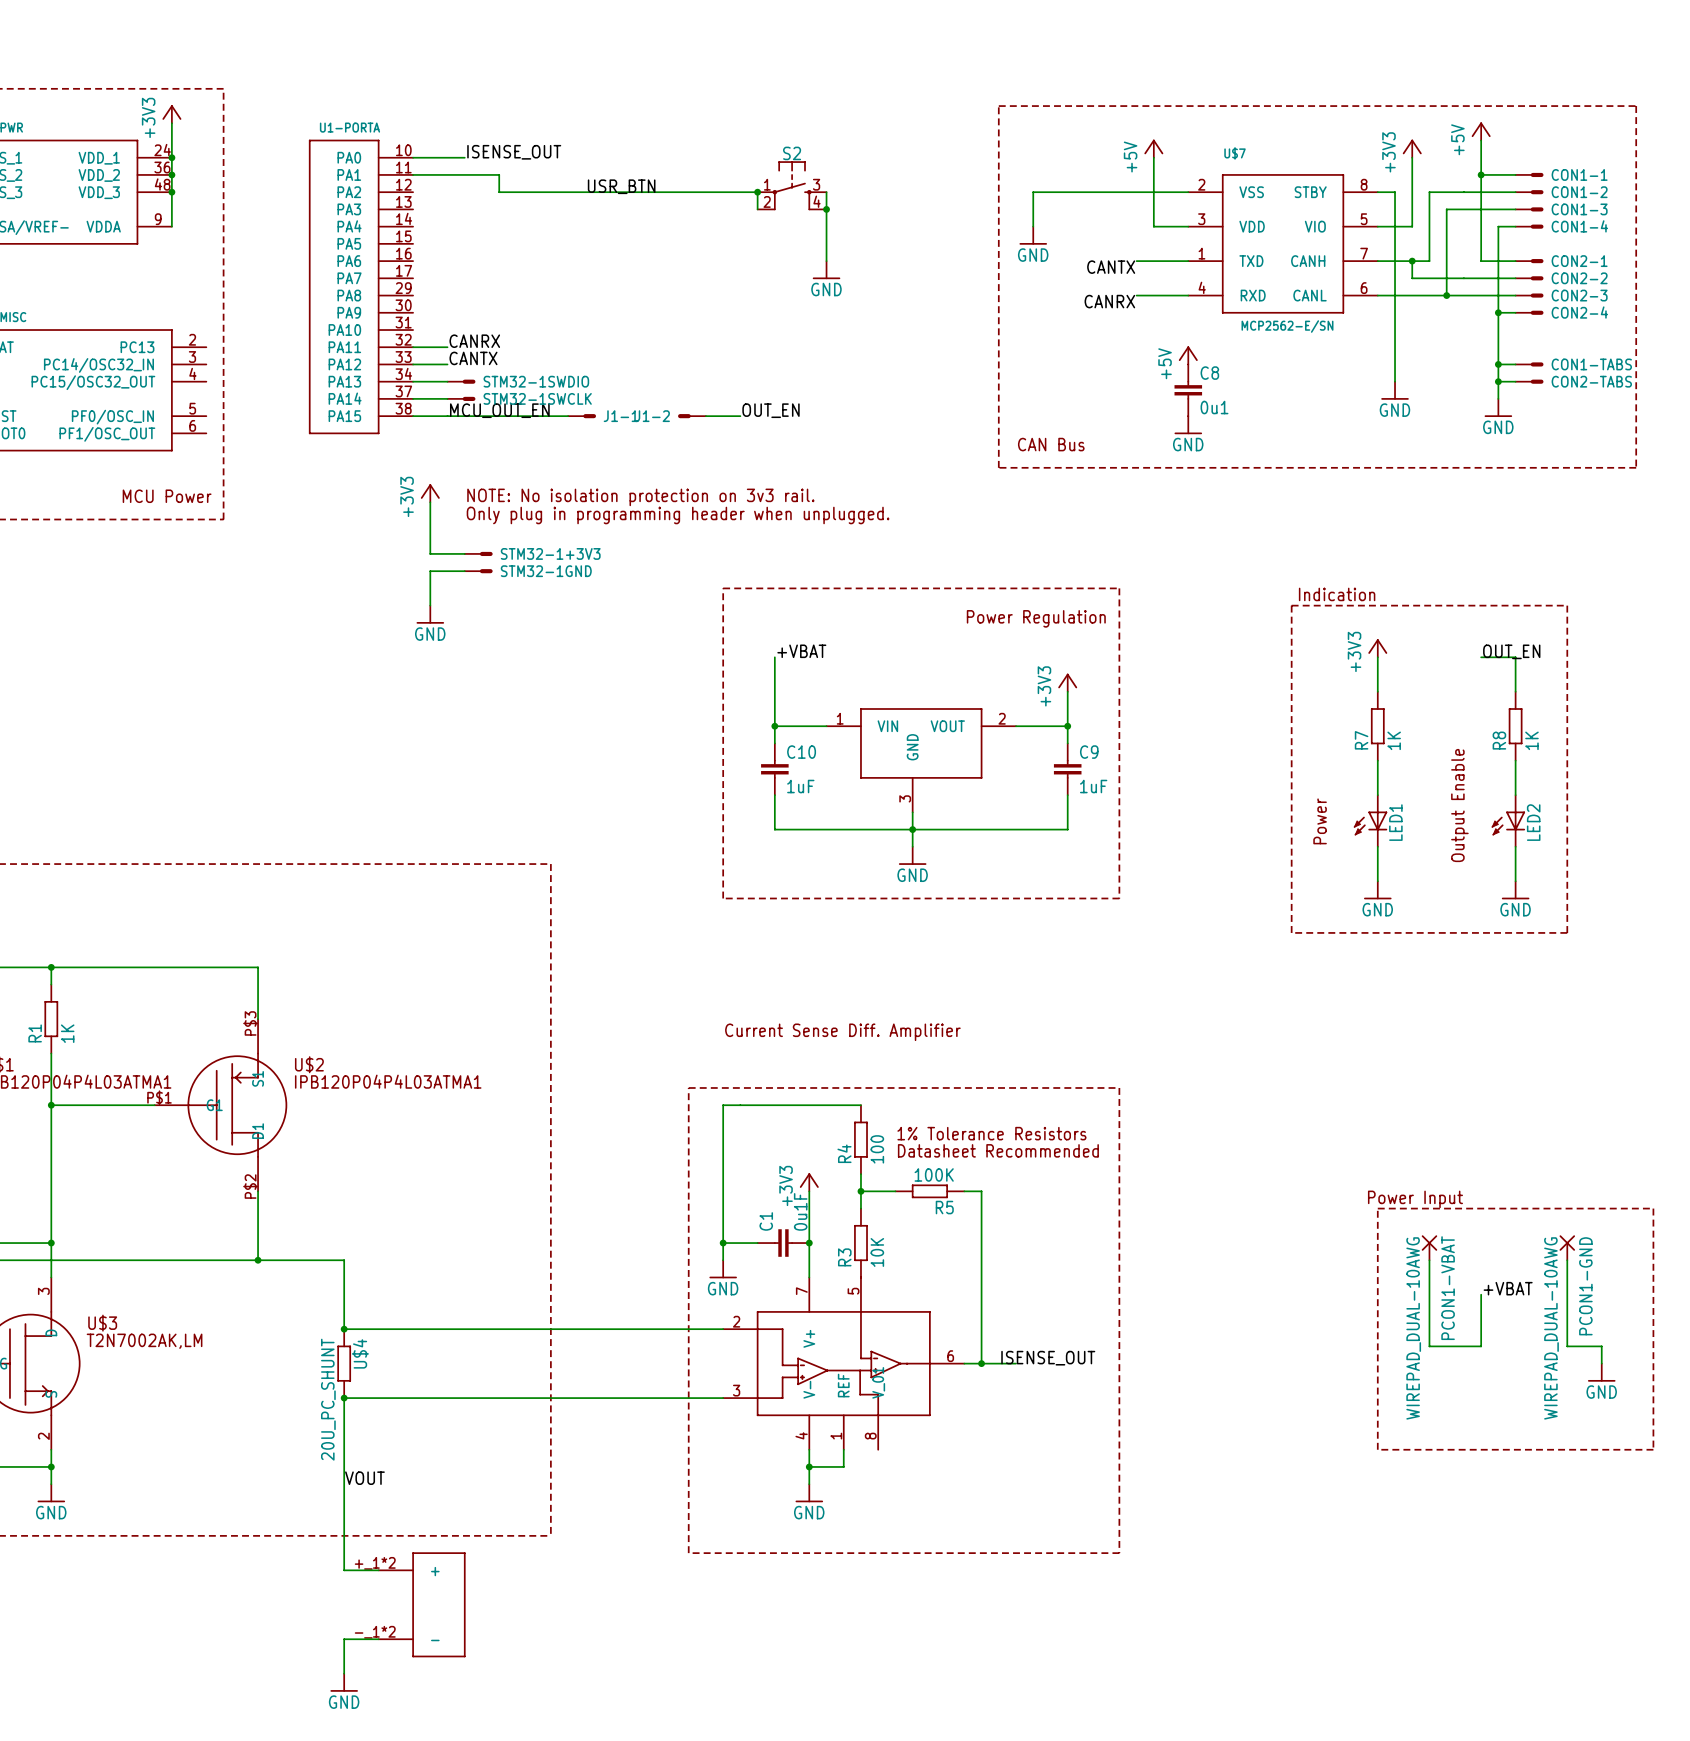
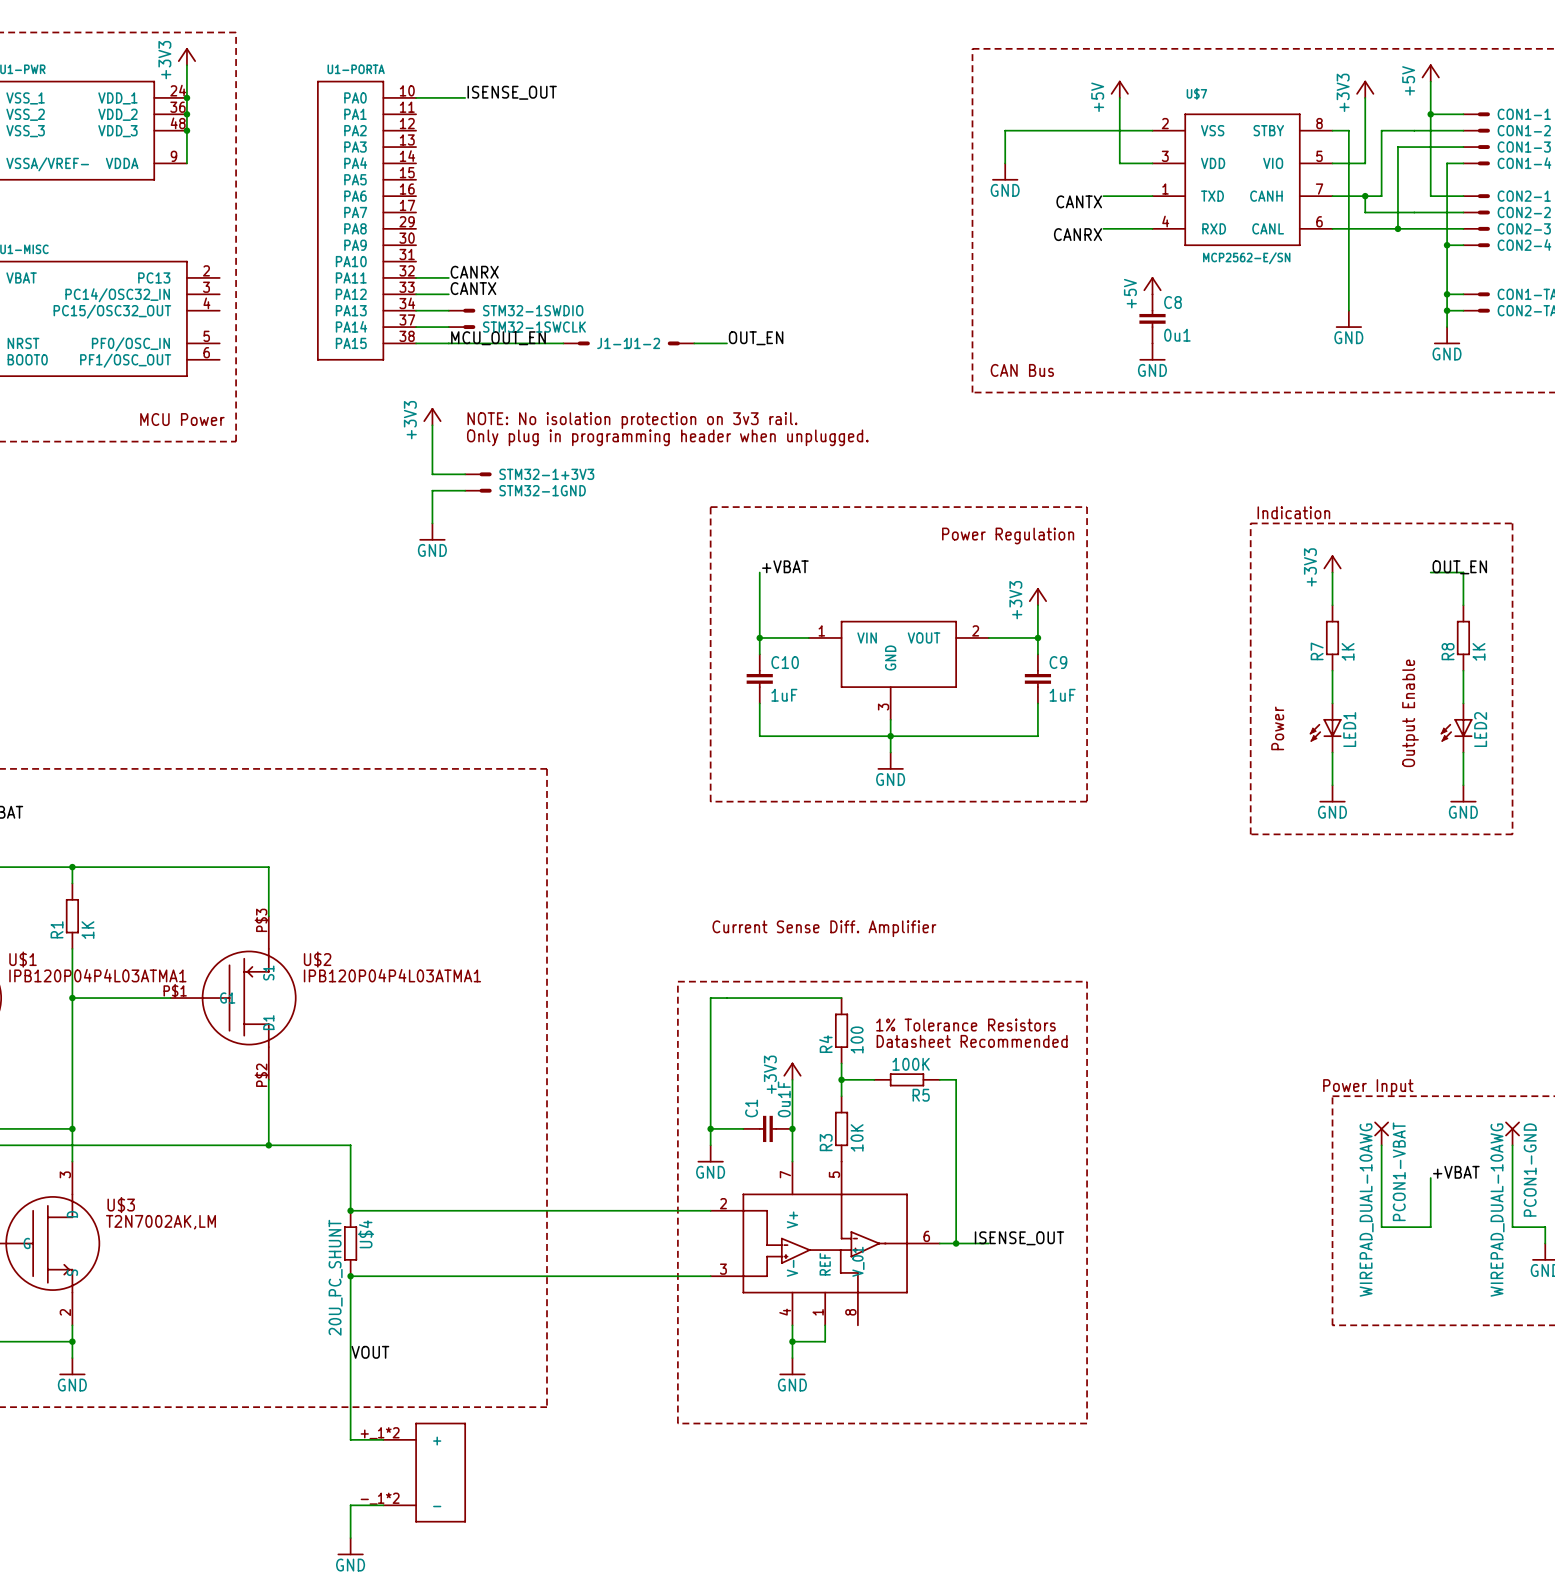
wire: (413, 174) (499, 174) (499, 192) (757, 192) (757, 209) -> none
S2: (792, 185) -> none
label: USR_BTN (621, 186) -> none
junction: (757, 192) -> none
wire: (826, 192) (826, 261) -> none
junction: (826, 209) -> none
power symbol: GND (826, 270) -> none

